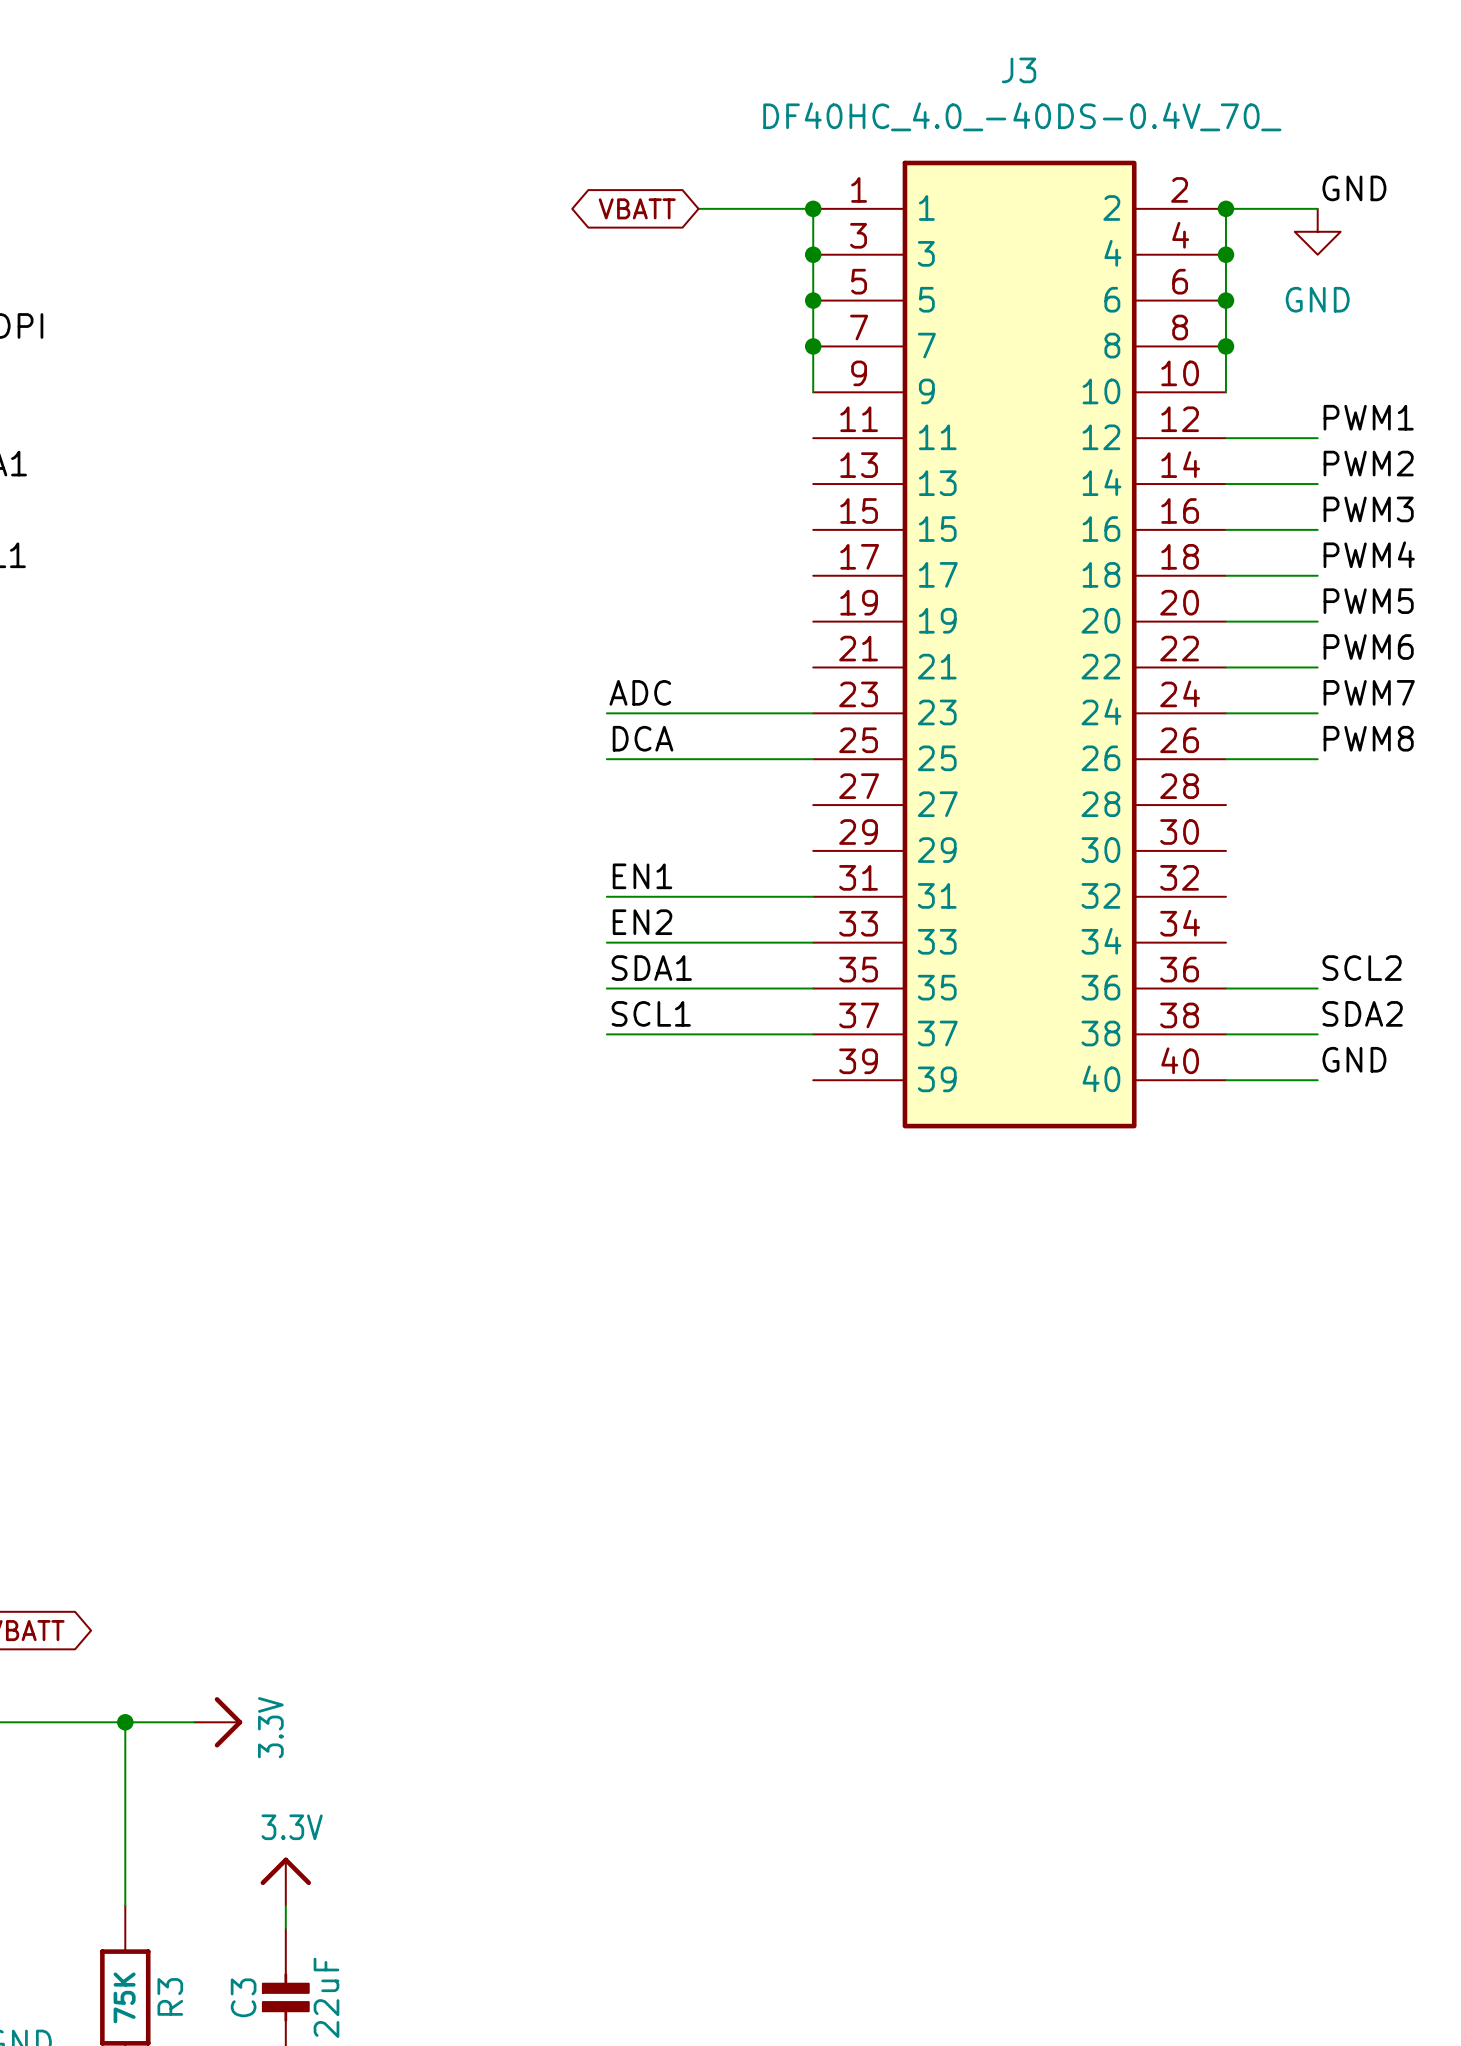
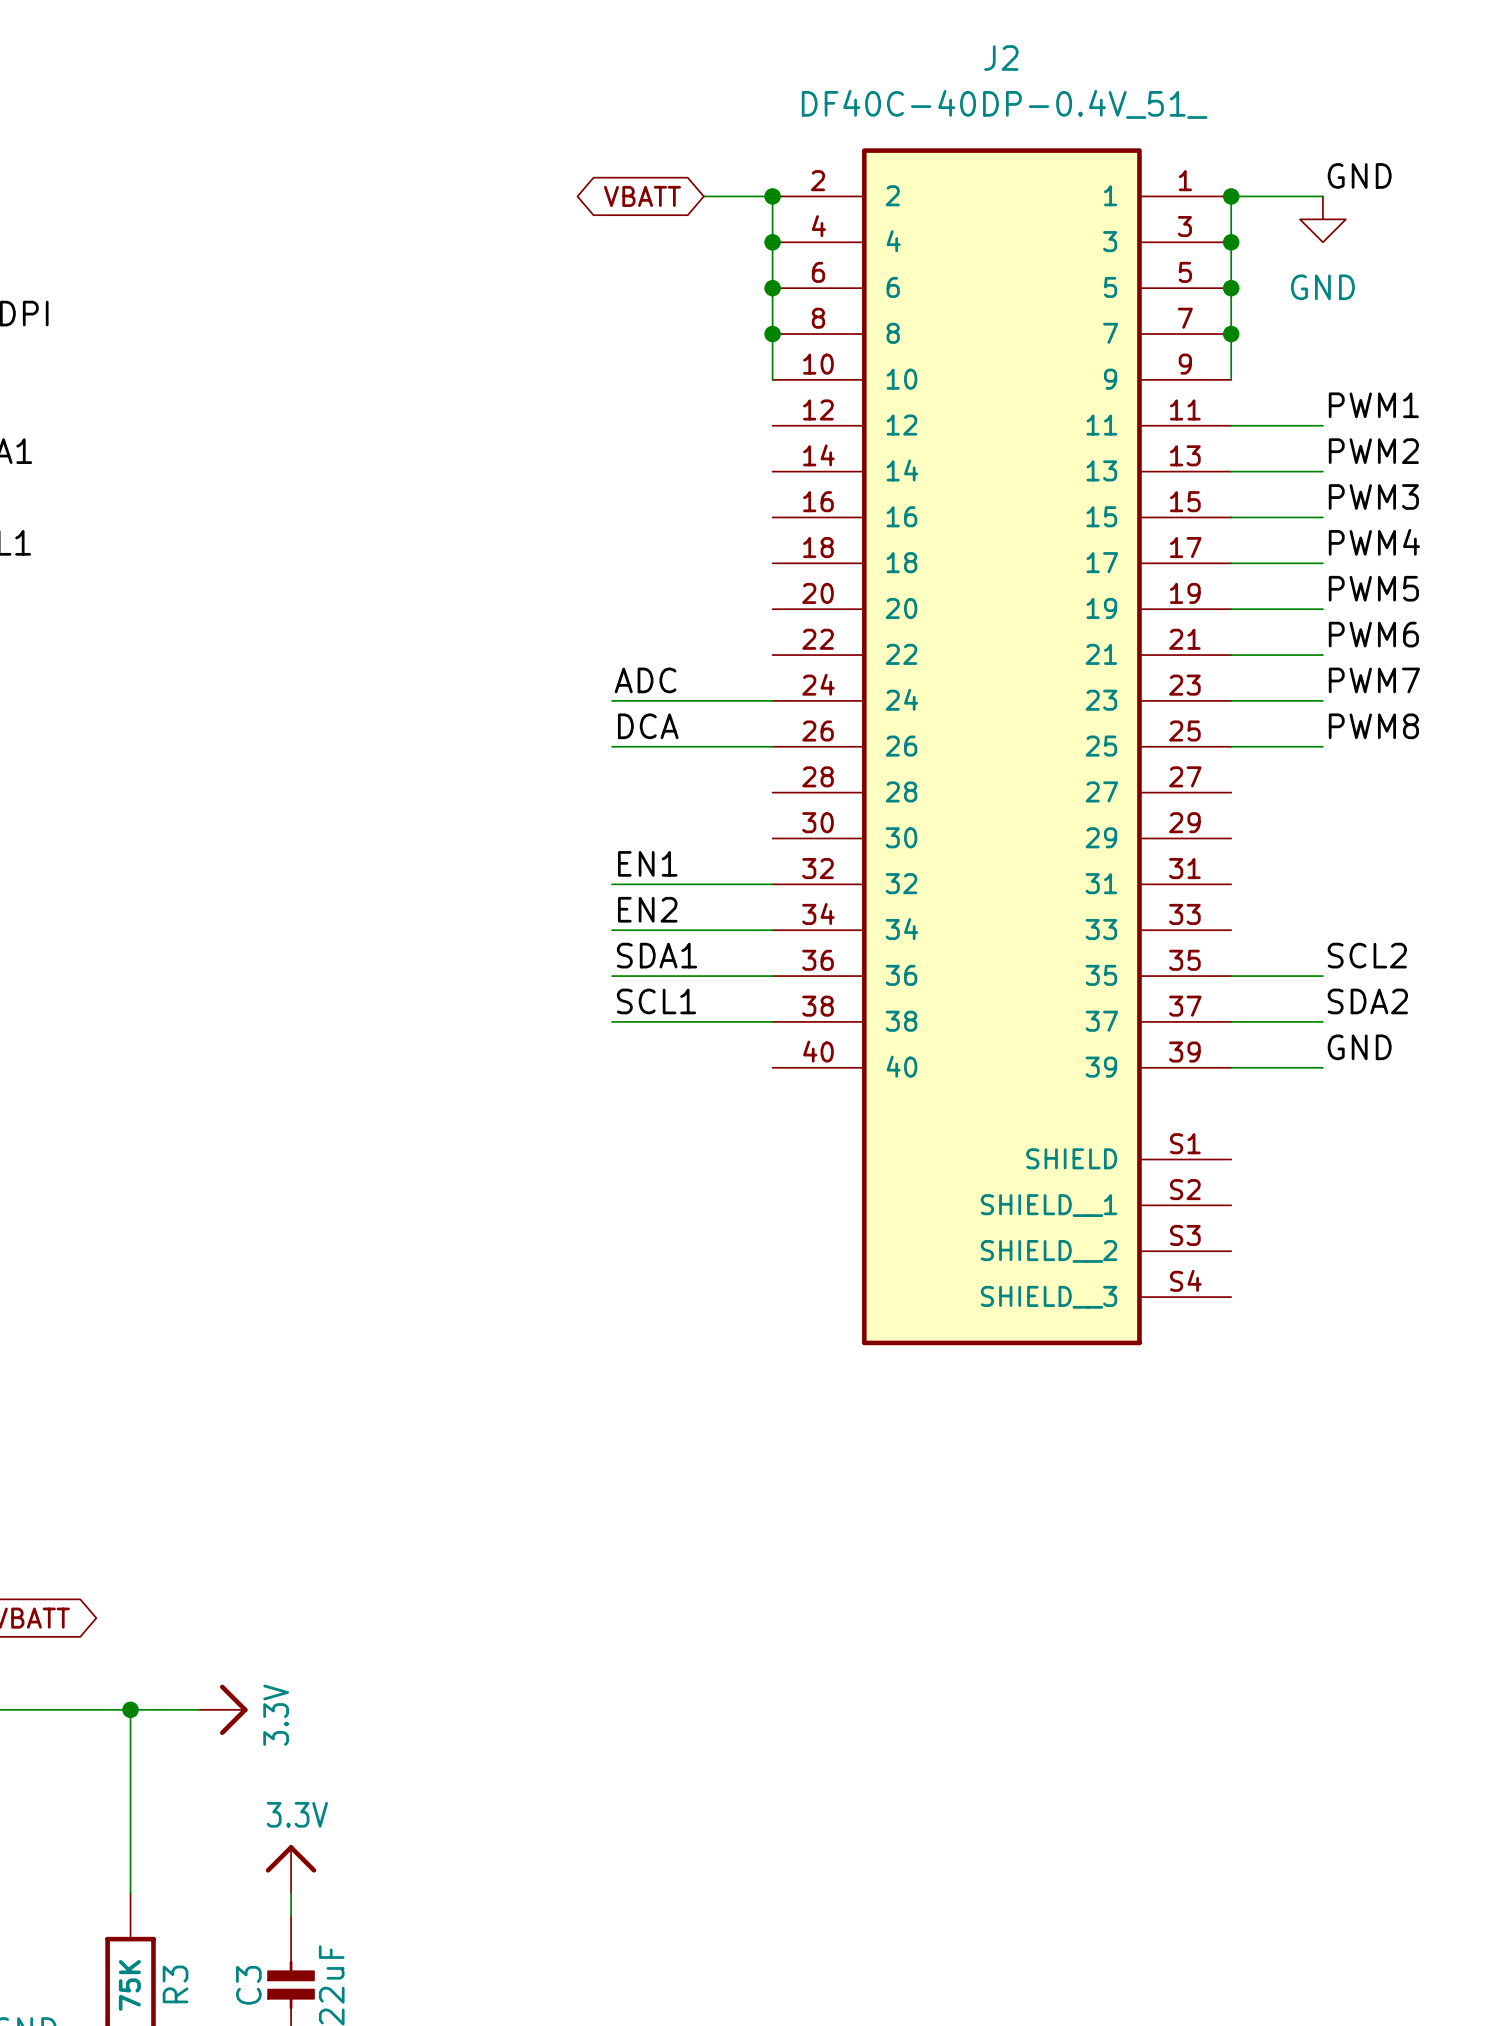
wire: (767, 208) (813, 208) (813, 392) -> (772, 196) (772, 379)
junction: none -> (772, 196)
junction: (813, 208) -> none
junction: none -> (772, 242)
junction: (813, 254) -> none
junction: none -> (772, 288)
junction: (813, 300) -> none
junction: none -> (772, 334)
junction: (813, 346) -> none
J3: DF40HC_4.0_-40DS-0.4V_70_ (1019, 644) -> none
J2: none -> DF40C-40DP-0.4V_51_ (1001, 746)

